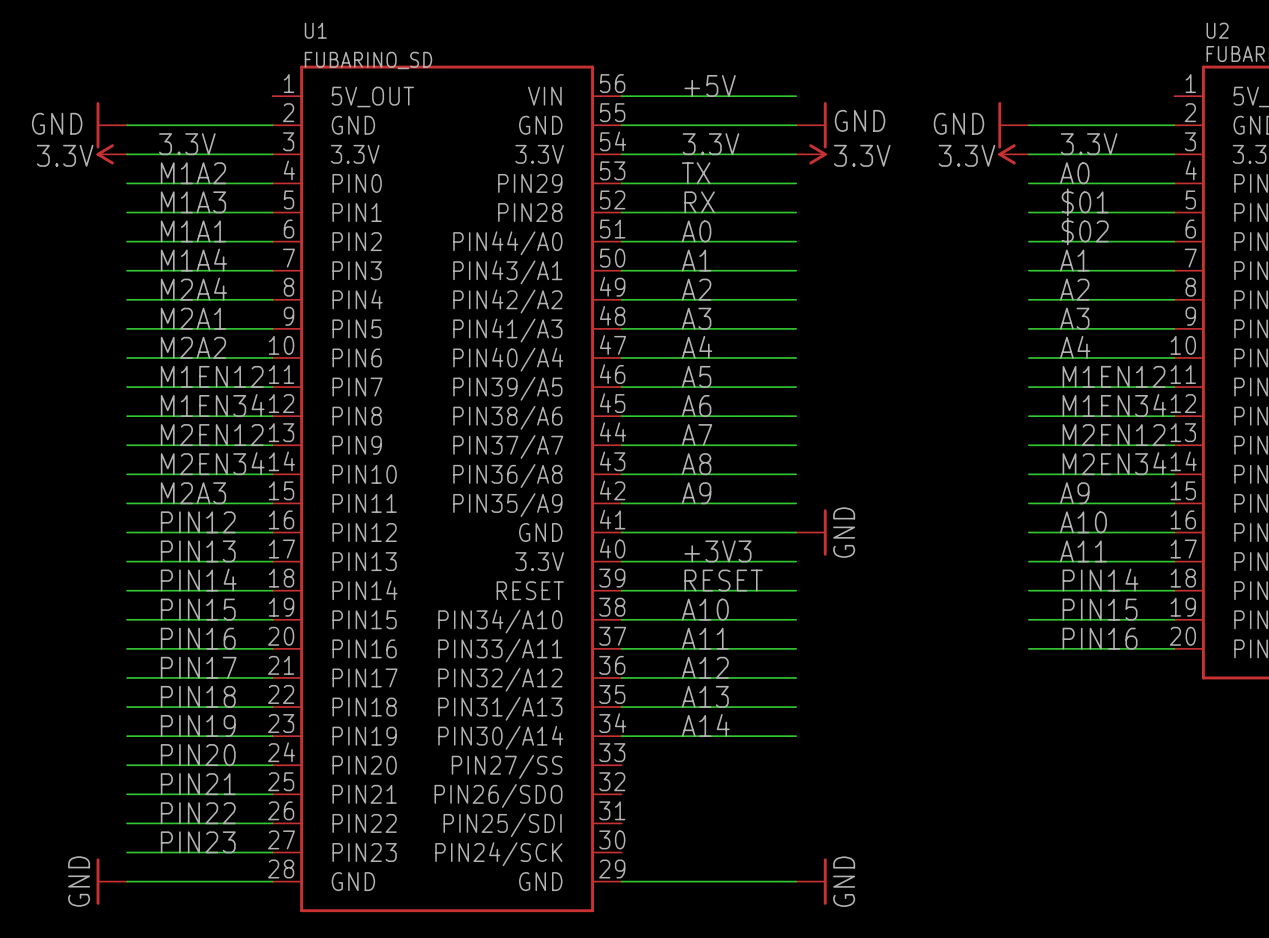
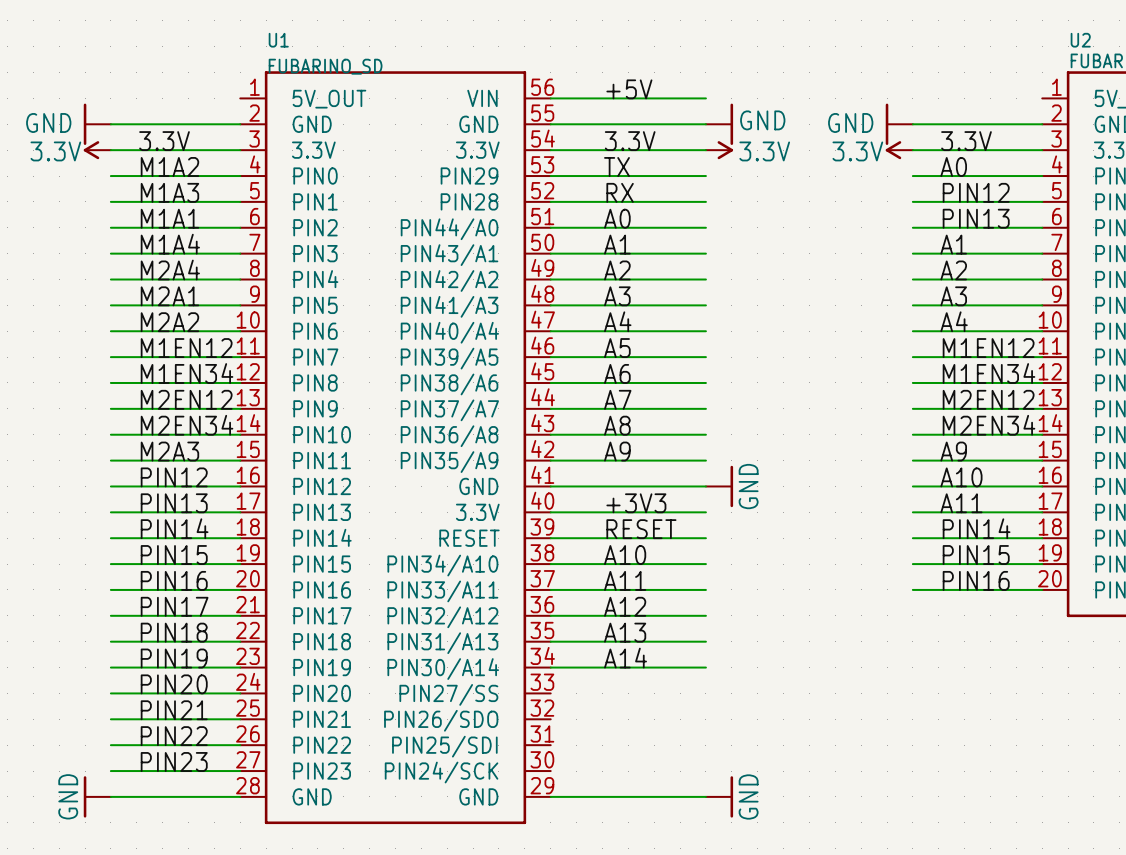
label: $01 (1085, 202) -> PIN12 (976, 192)
label: $02 (1085, 231) -> PIN13 (976, 218)

